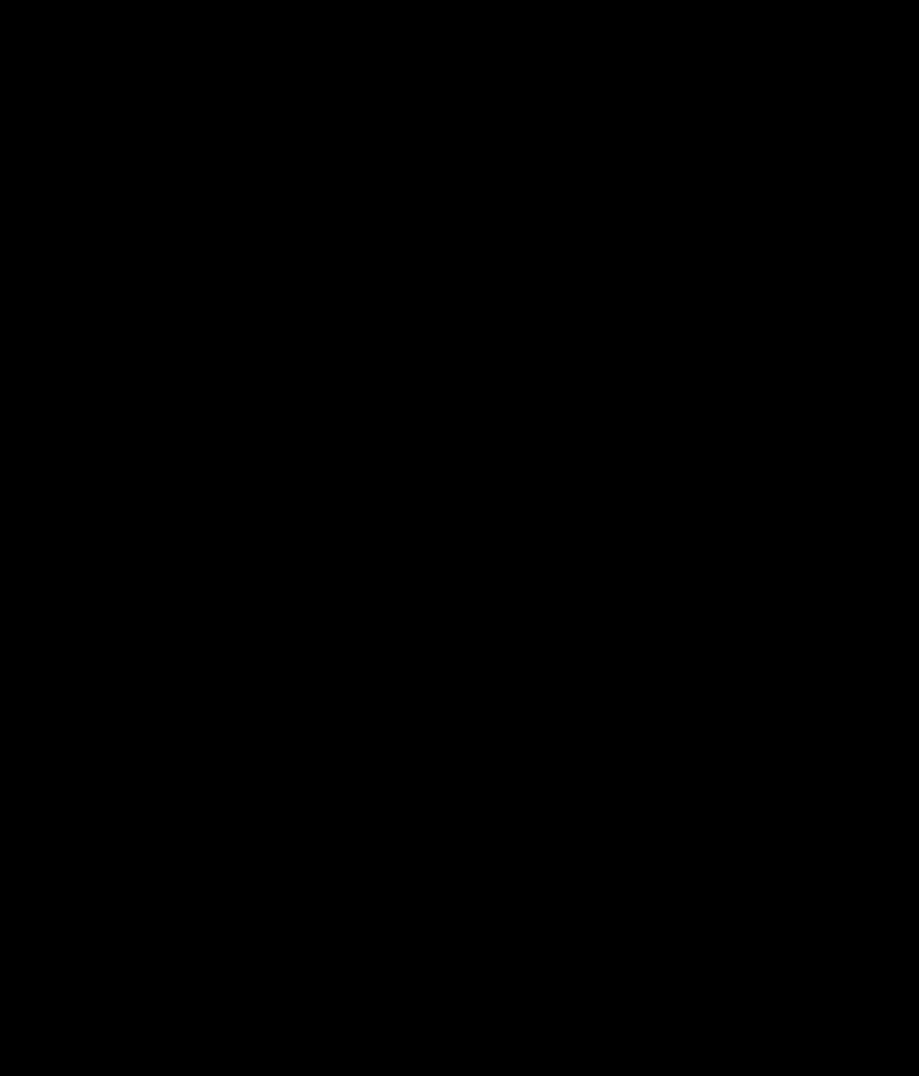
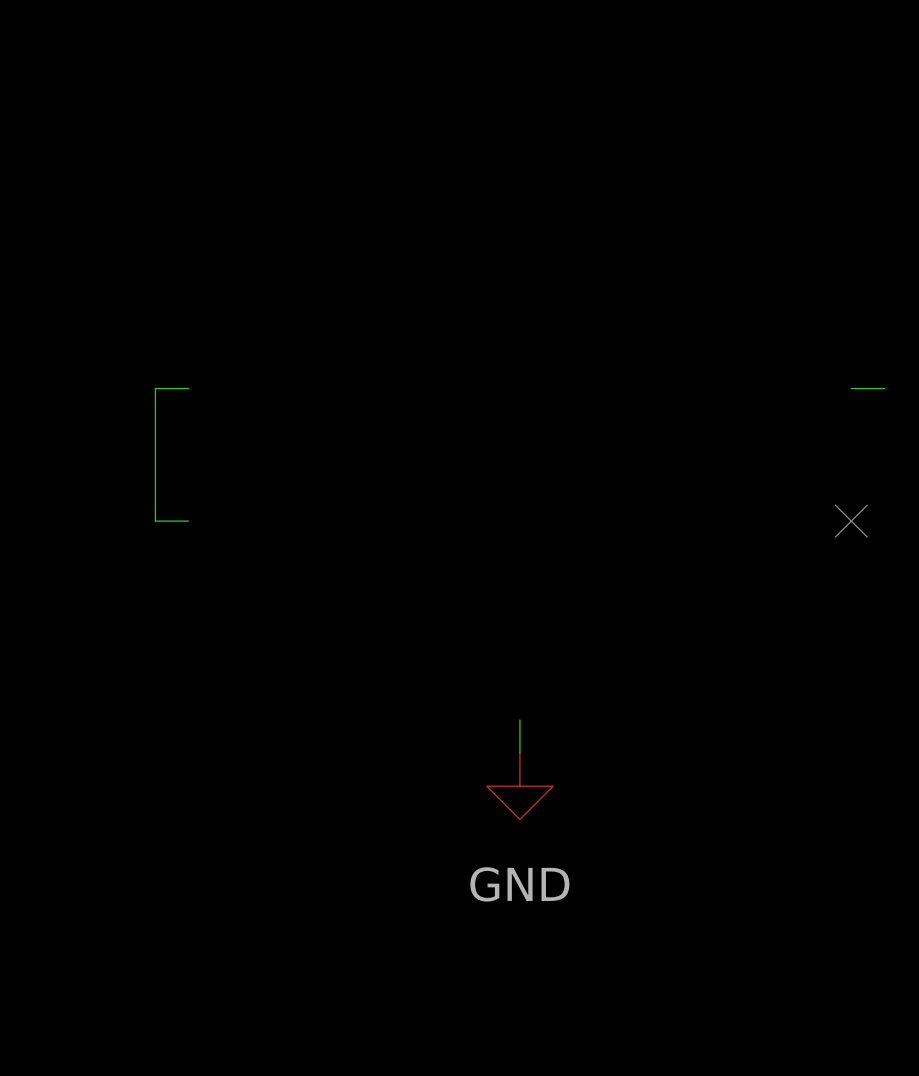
wire: none -> (188, 388) (155, 388) (155, 521) (188, 521)
wire: none -> (851, 388) (884, 388)
no-connect mark: none -> (851, 521)
wire: none -> (519, 719) (519, 753)
power symbol: none -> GND (519, 786)

